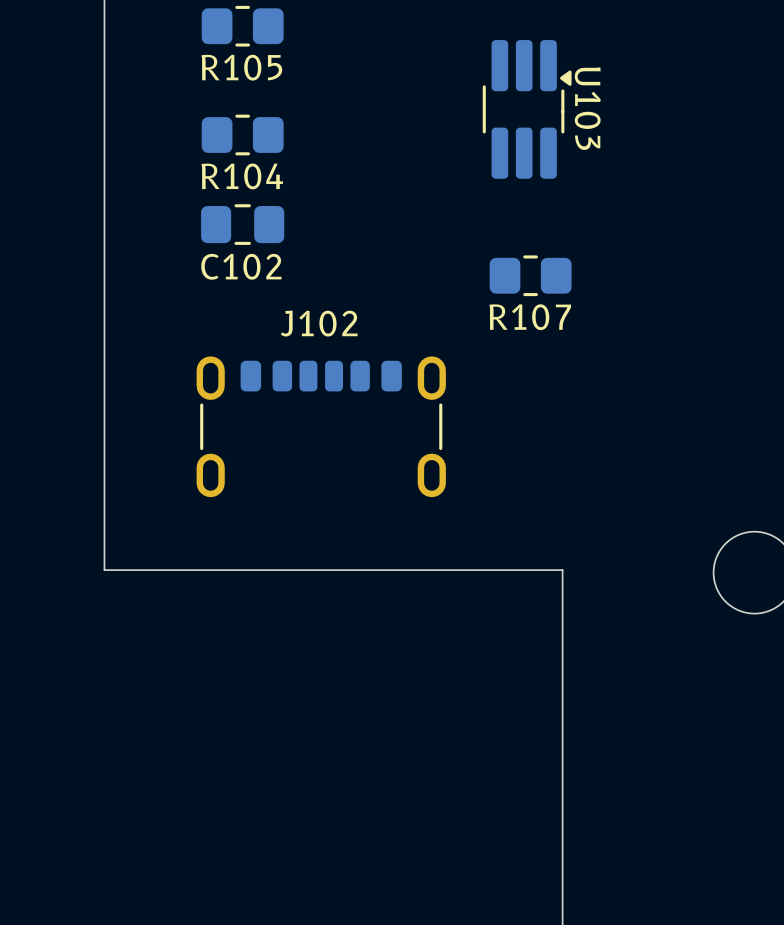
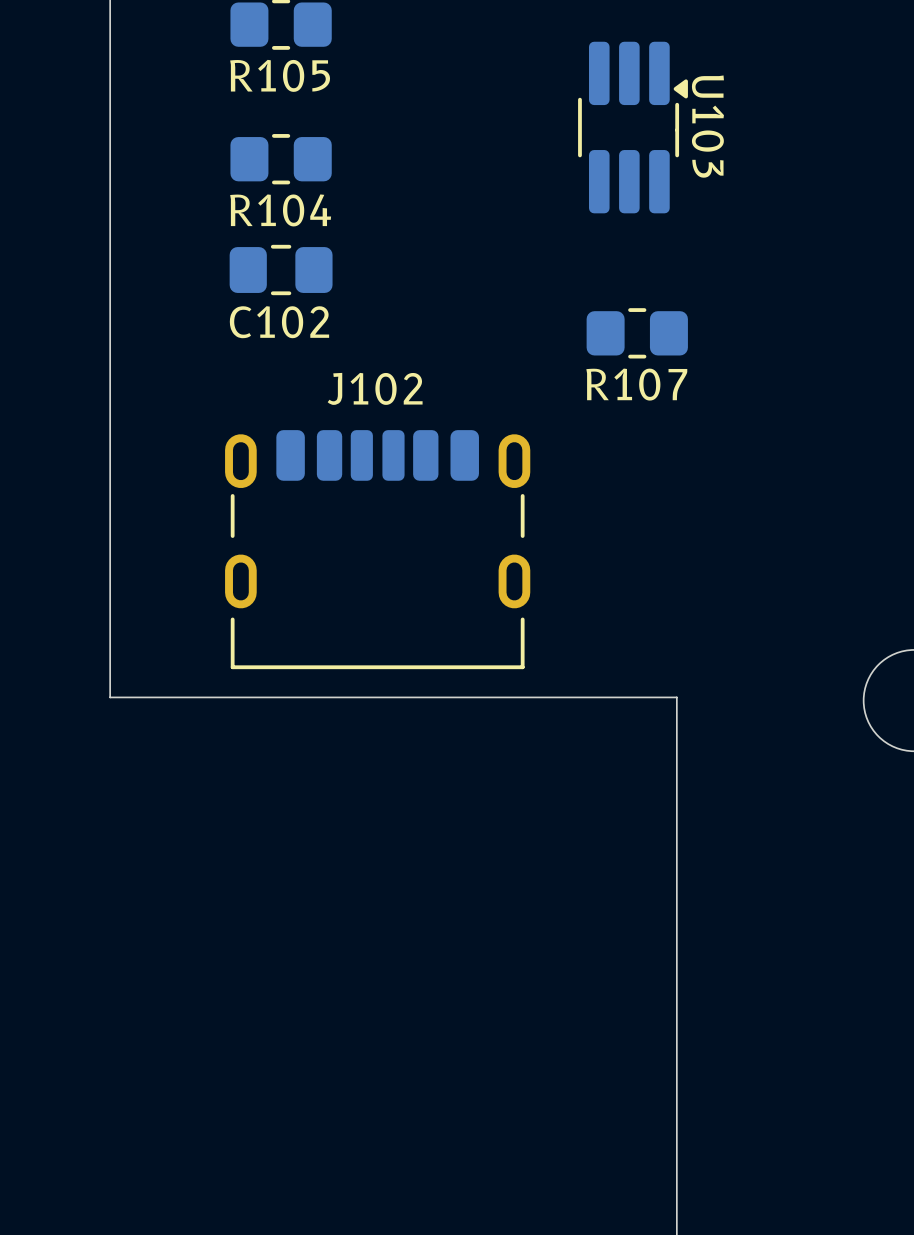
J102 footprint: [196, 356, 446, 498] -> [225, 430, 531, 670]

